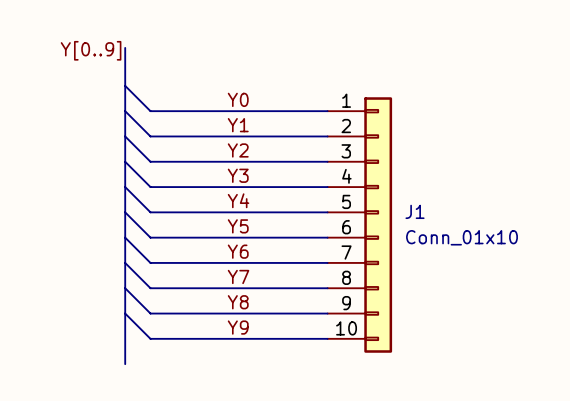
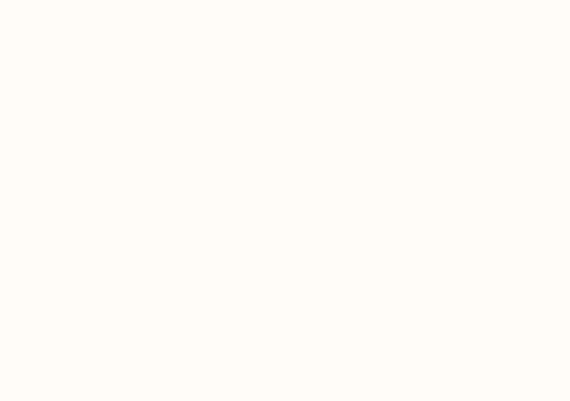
bus: (125, 47) (125, 364) -> none
label: Y[0..9] (91, 50) -> none
wire: (125, 85) (150, 111) (327, 111) -> none
label: Y0 (238, 99) -> none
wire: (125, 111) (150, 136) (327, 136) -> none
label: Y1 (238, 125) -> none
wire: (125, 136) (150, 161) (327, 161) -> none
label: Y2 (238, 150) -> none
wire: (125, 161) (150, 187) (327, 187) -> none
label: Y3 (238, 175) -> none
wire: (125, 187) (150, 212) (327, 212) -> none
label: Y4 (238, 200) -> none
wire: (125, 212) (150, 237) (327, 237) -> none
J1: Conn_01x10 (359, 225) -> none
label: Y5 (238, 226) -> none
wire: (125, 237) (150, 262) (327, 262) -> none
label: Y6 (238, 251) -> none
wire: (125, 262) (150, 288) (327, 288) -> none
label: Y7 (238, 276) -> none
wire: (125, 288) (150, 313) (327, 313) -> none
label: Y8 (238, 302) -> none
wire: (125, 313) (150, 338) (327, 338) -> none
label: Y9 (238, 327) -> none

